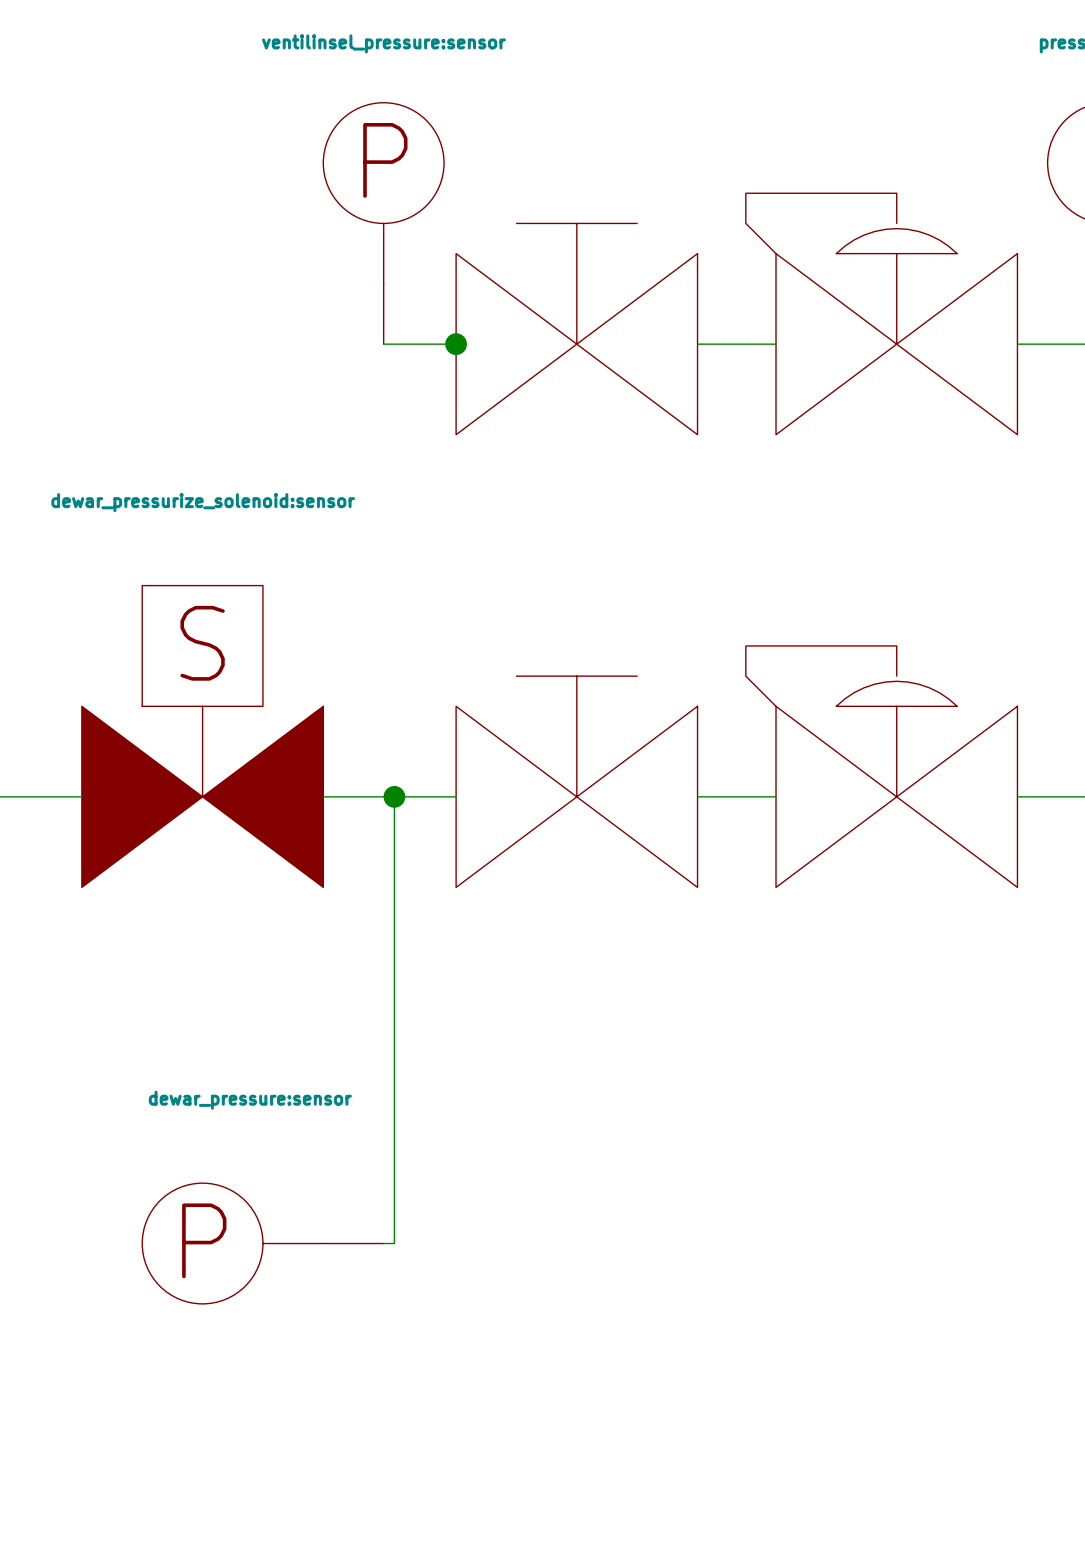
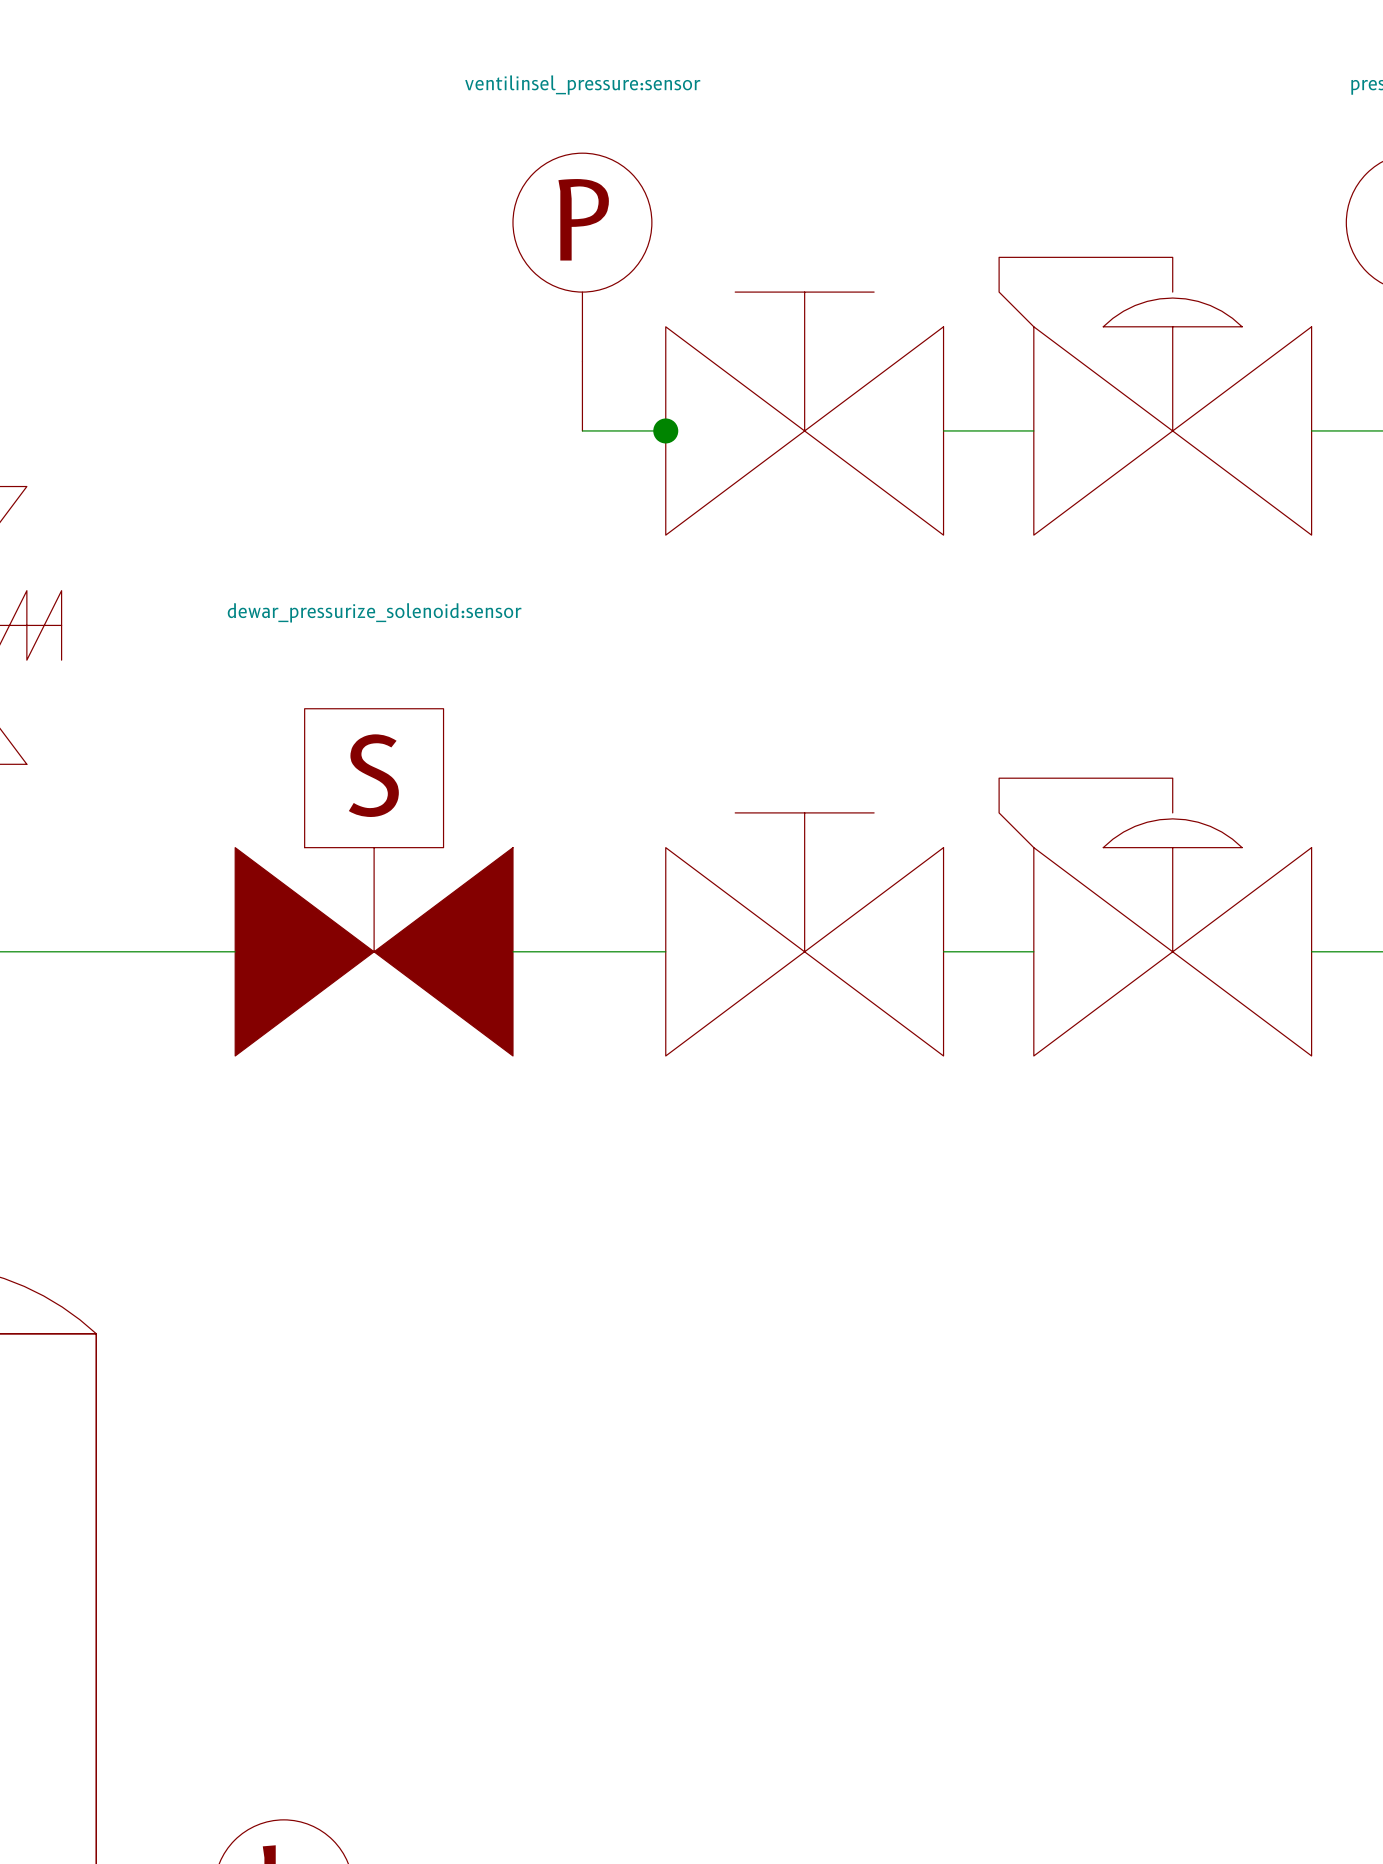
wire: (394, 796) (394, 1243) (383, 1243) -> none
junction: (394, 796) -> none
part: dewar_pressure:sensor (262, 1243) -> none

